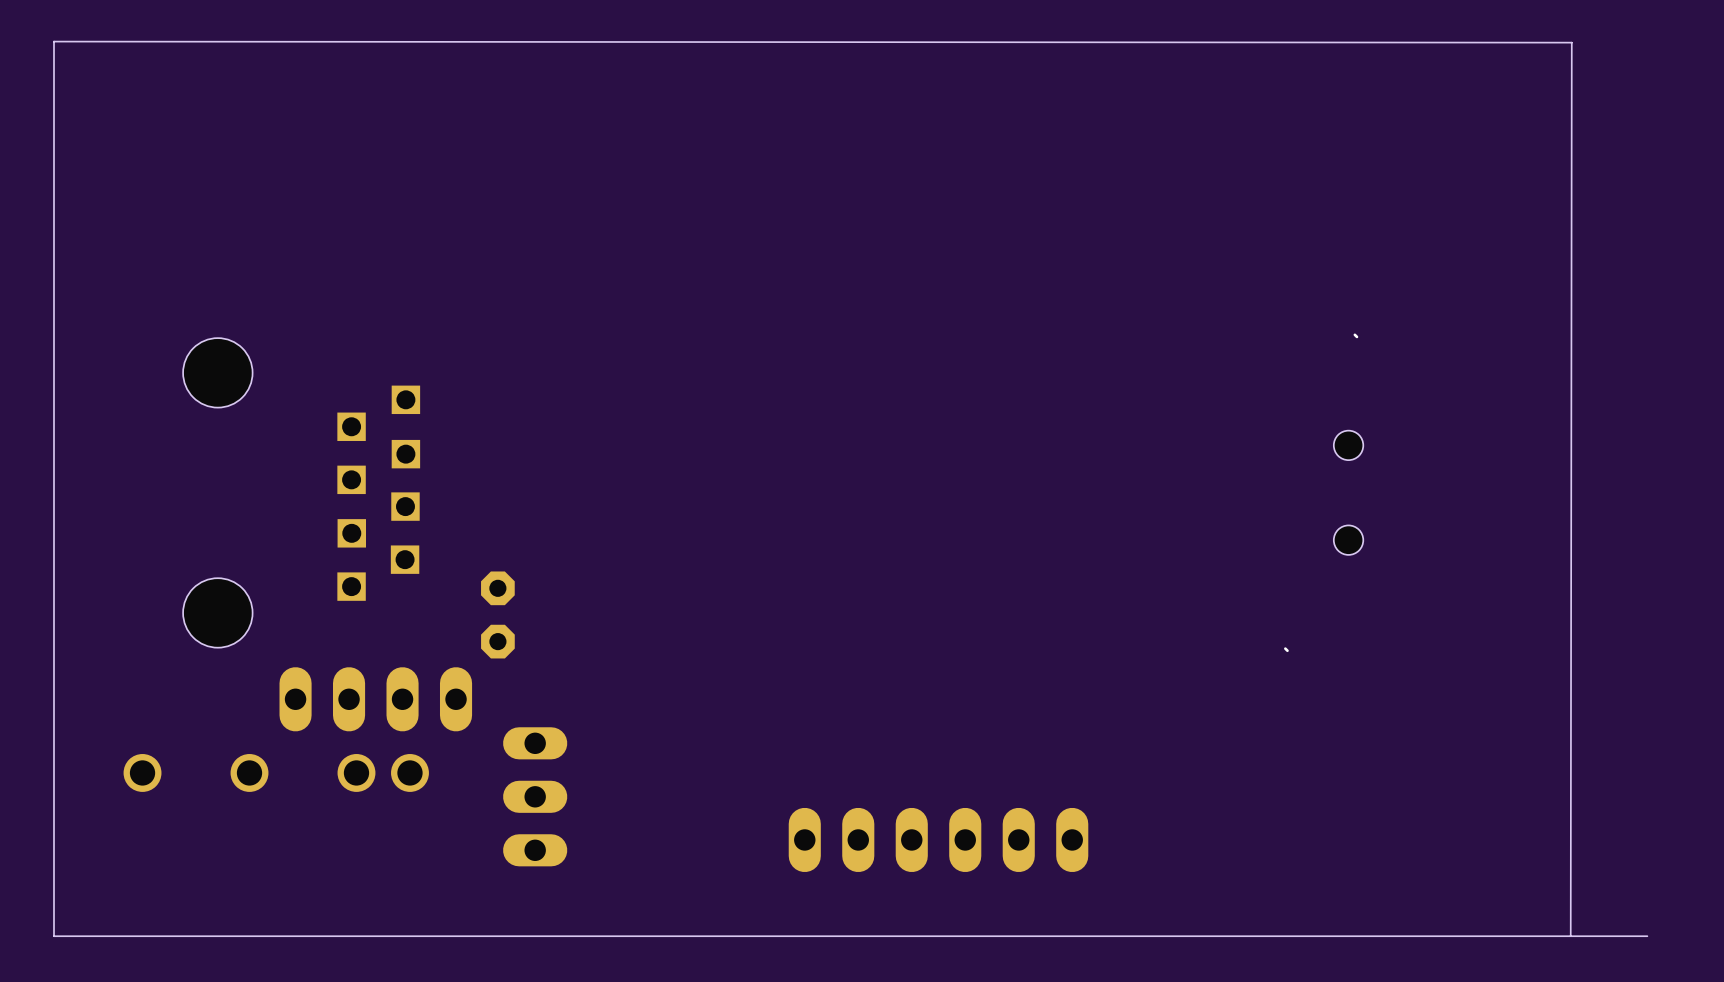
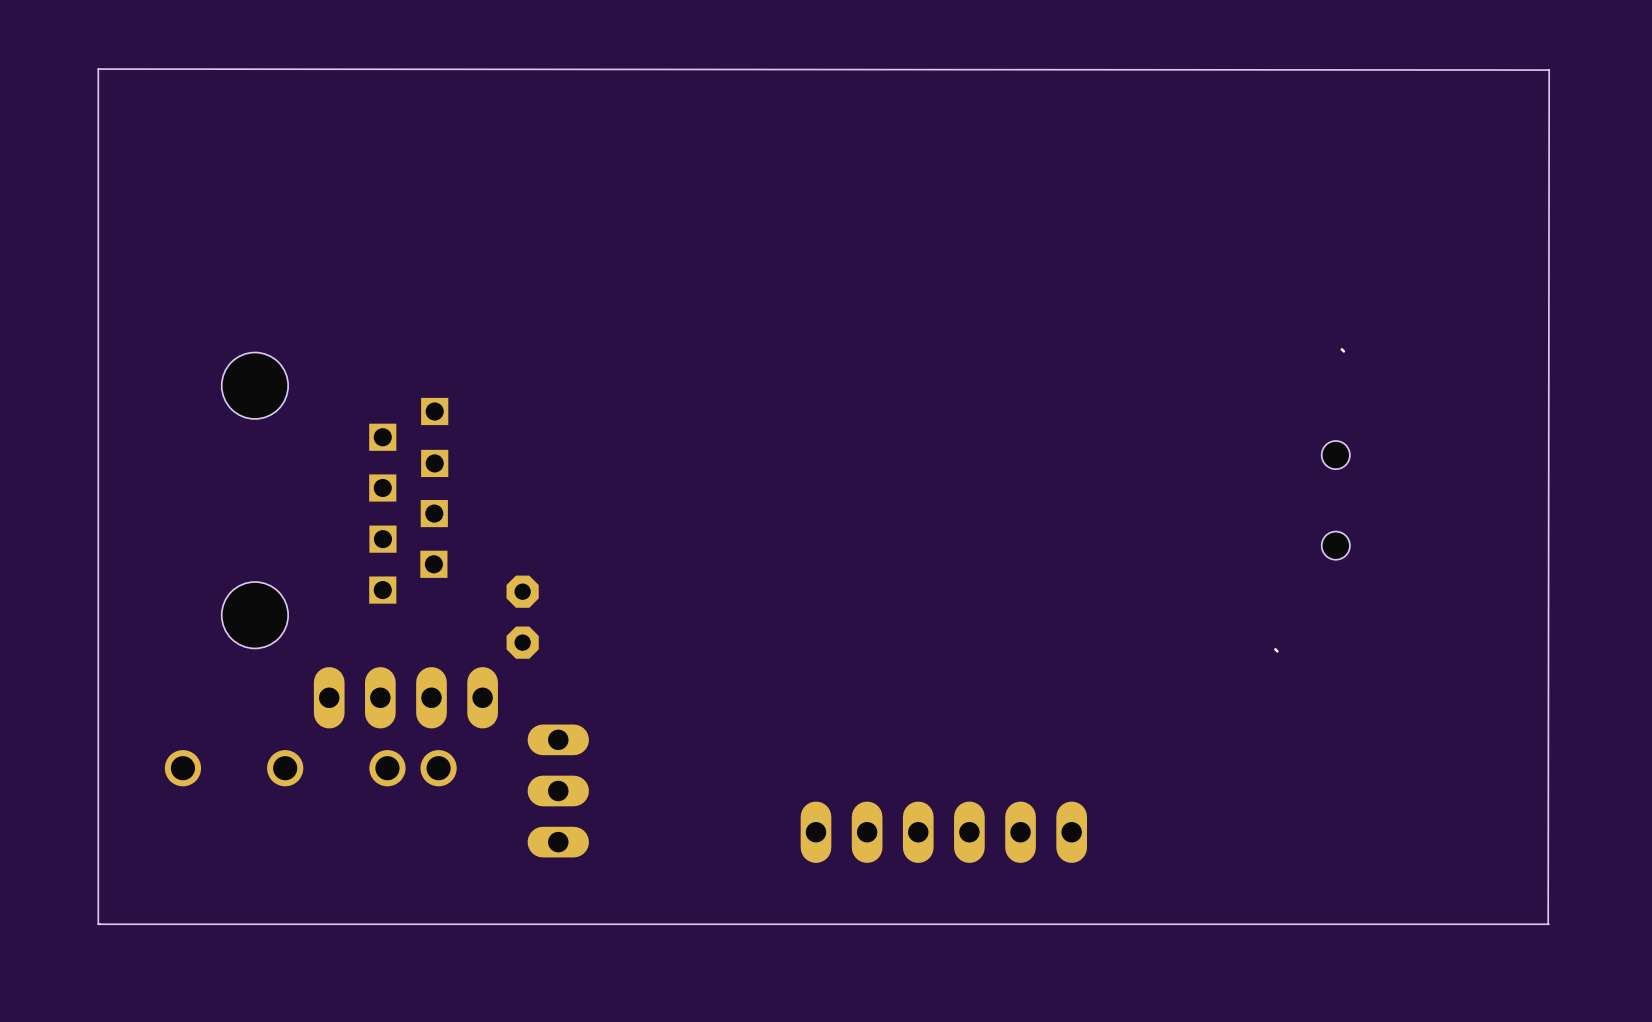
board edge: (1647, 936) (1571, 936) -> none

